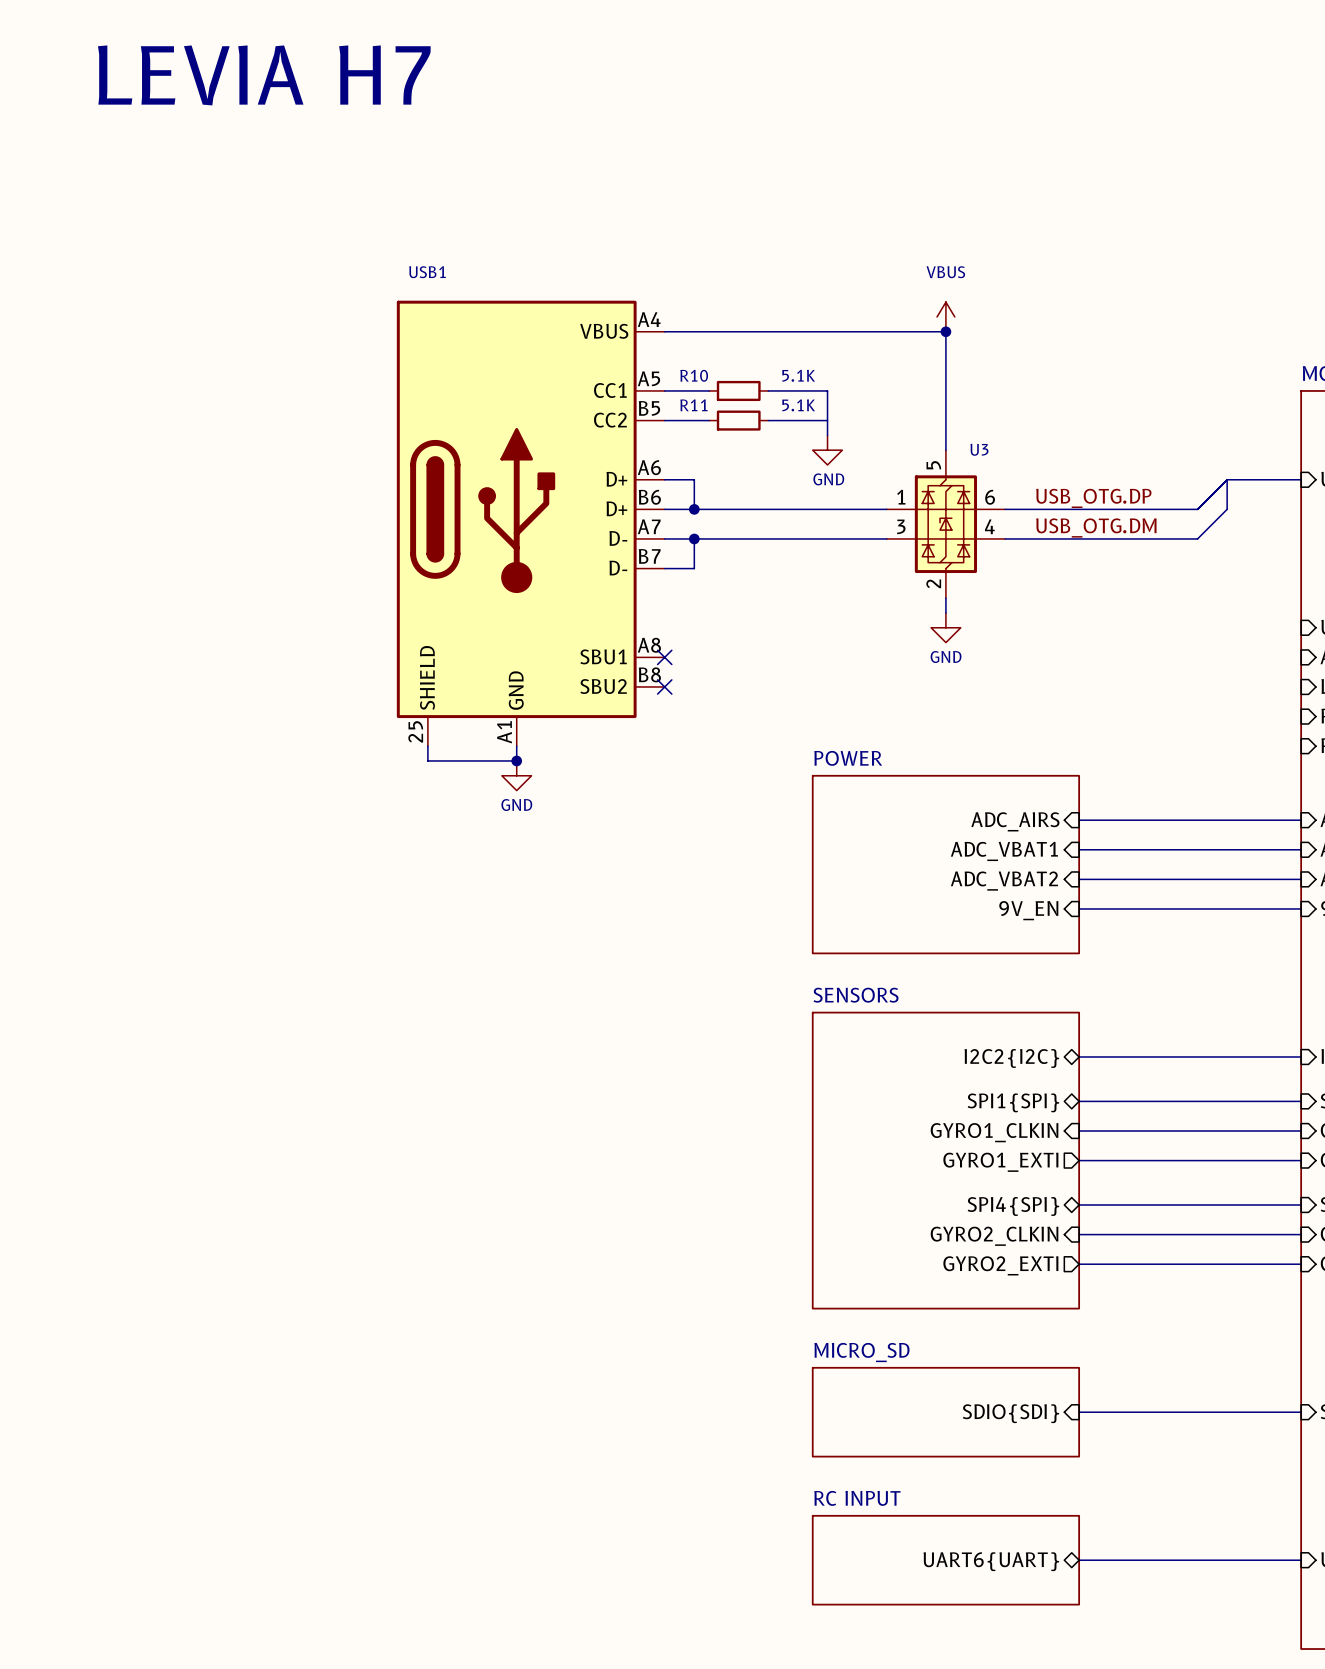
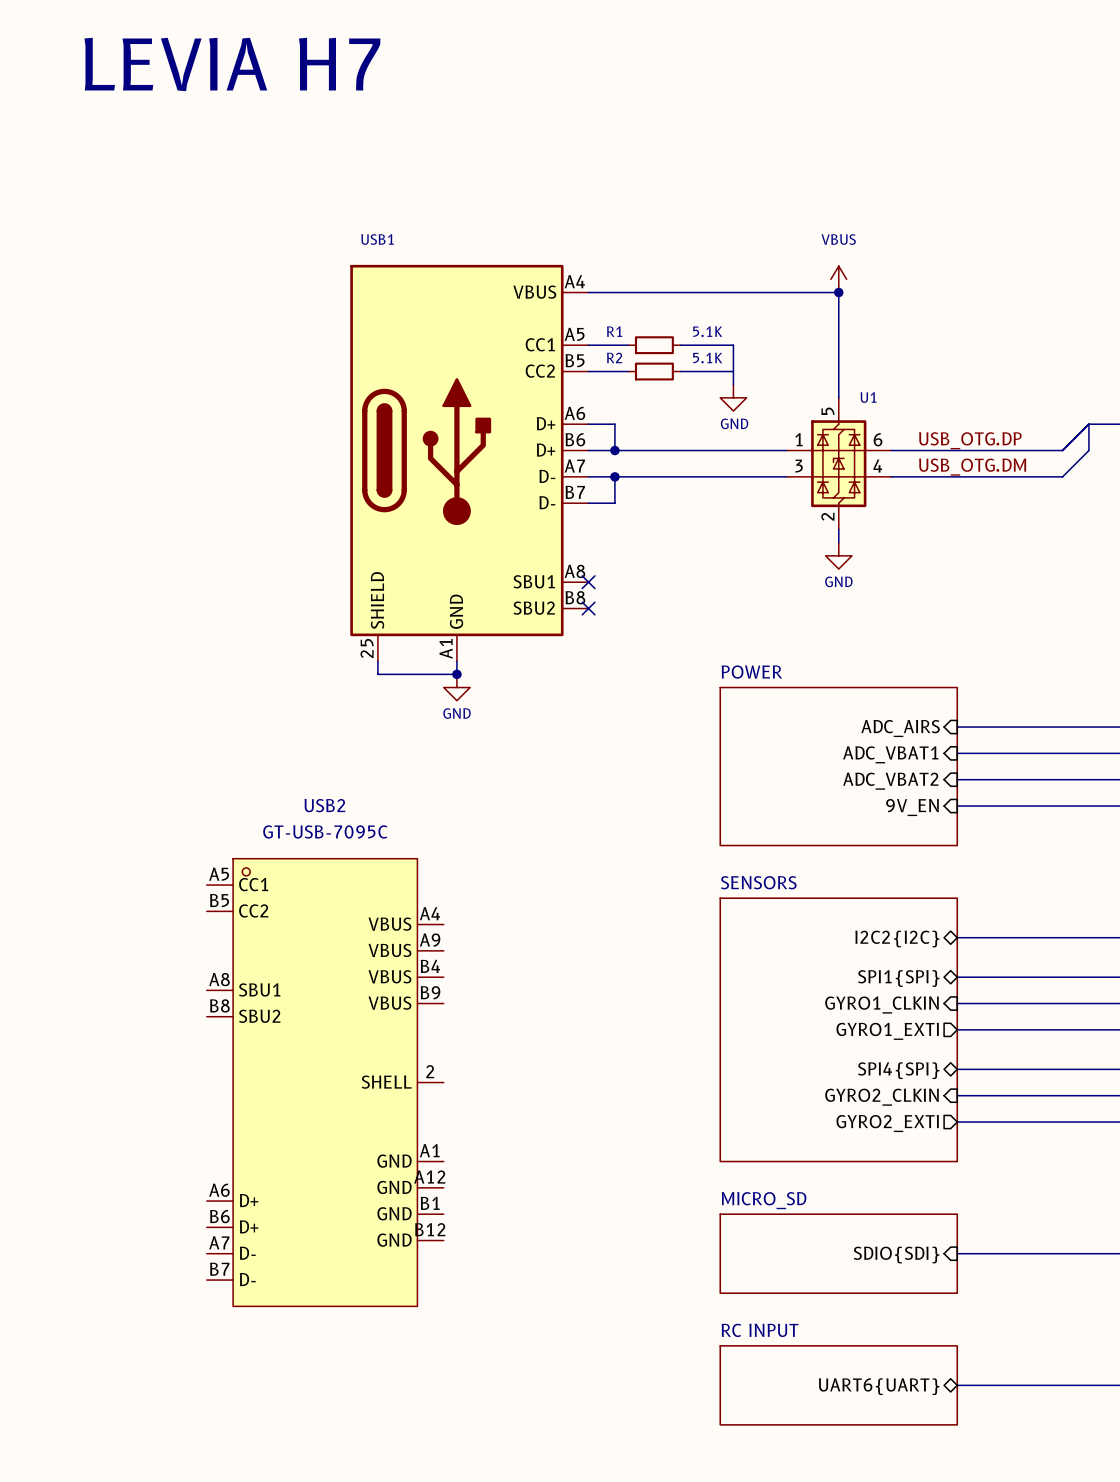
R10 name: R10 (694, 375) -> R1 (614, 331)
R11 name: R11 (693, 405) -> R2 (614, 357)
U3 name: U3 (979, 449) -> U1 (868, 397)
USB2: none -> GT-USB-7095C (325, 1082)

